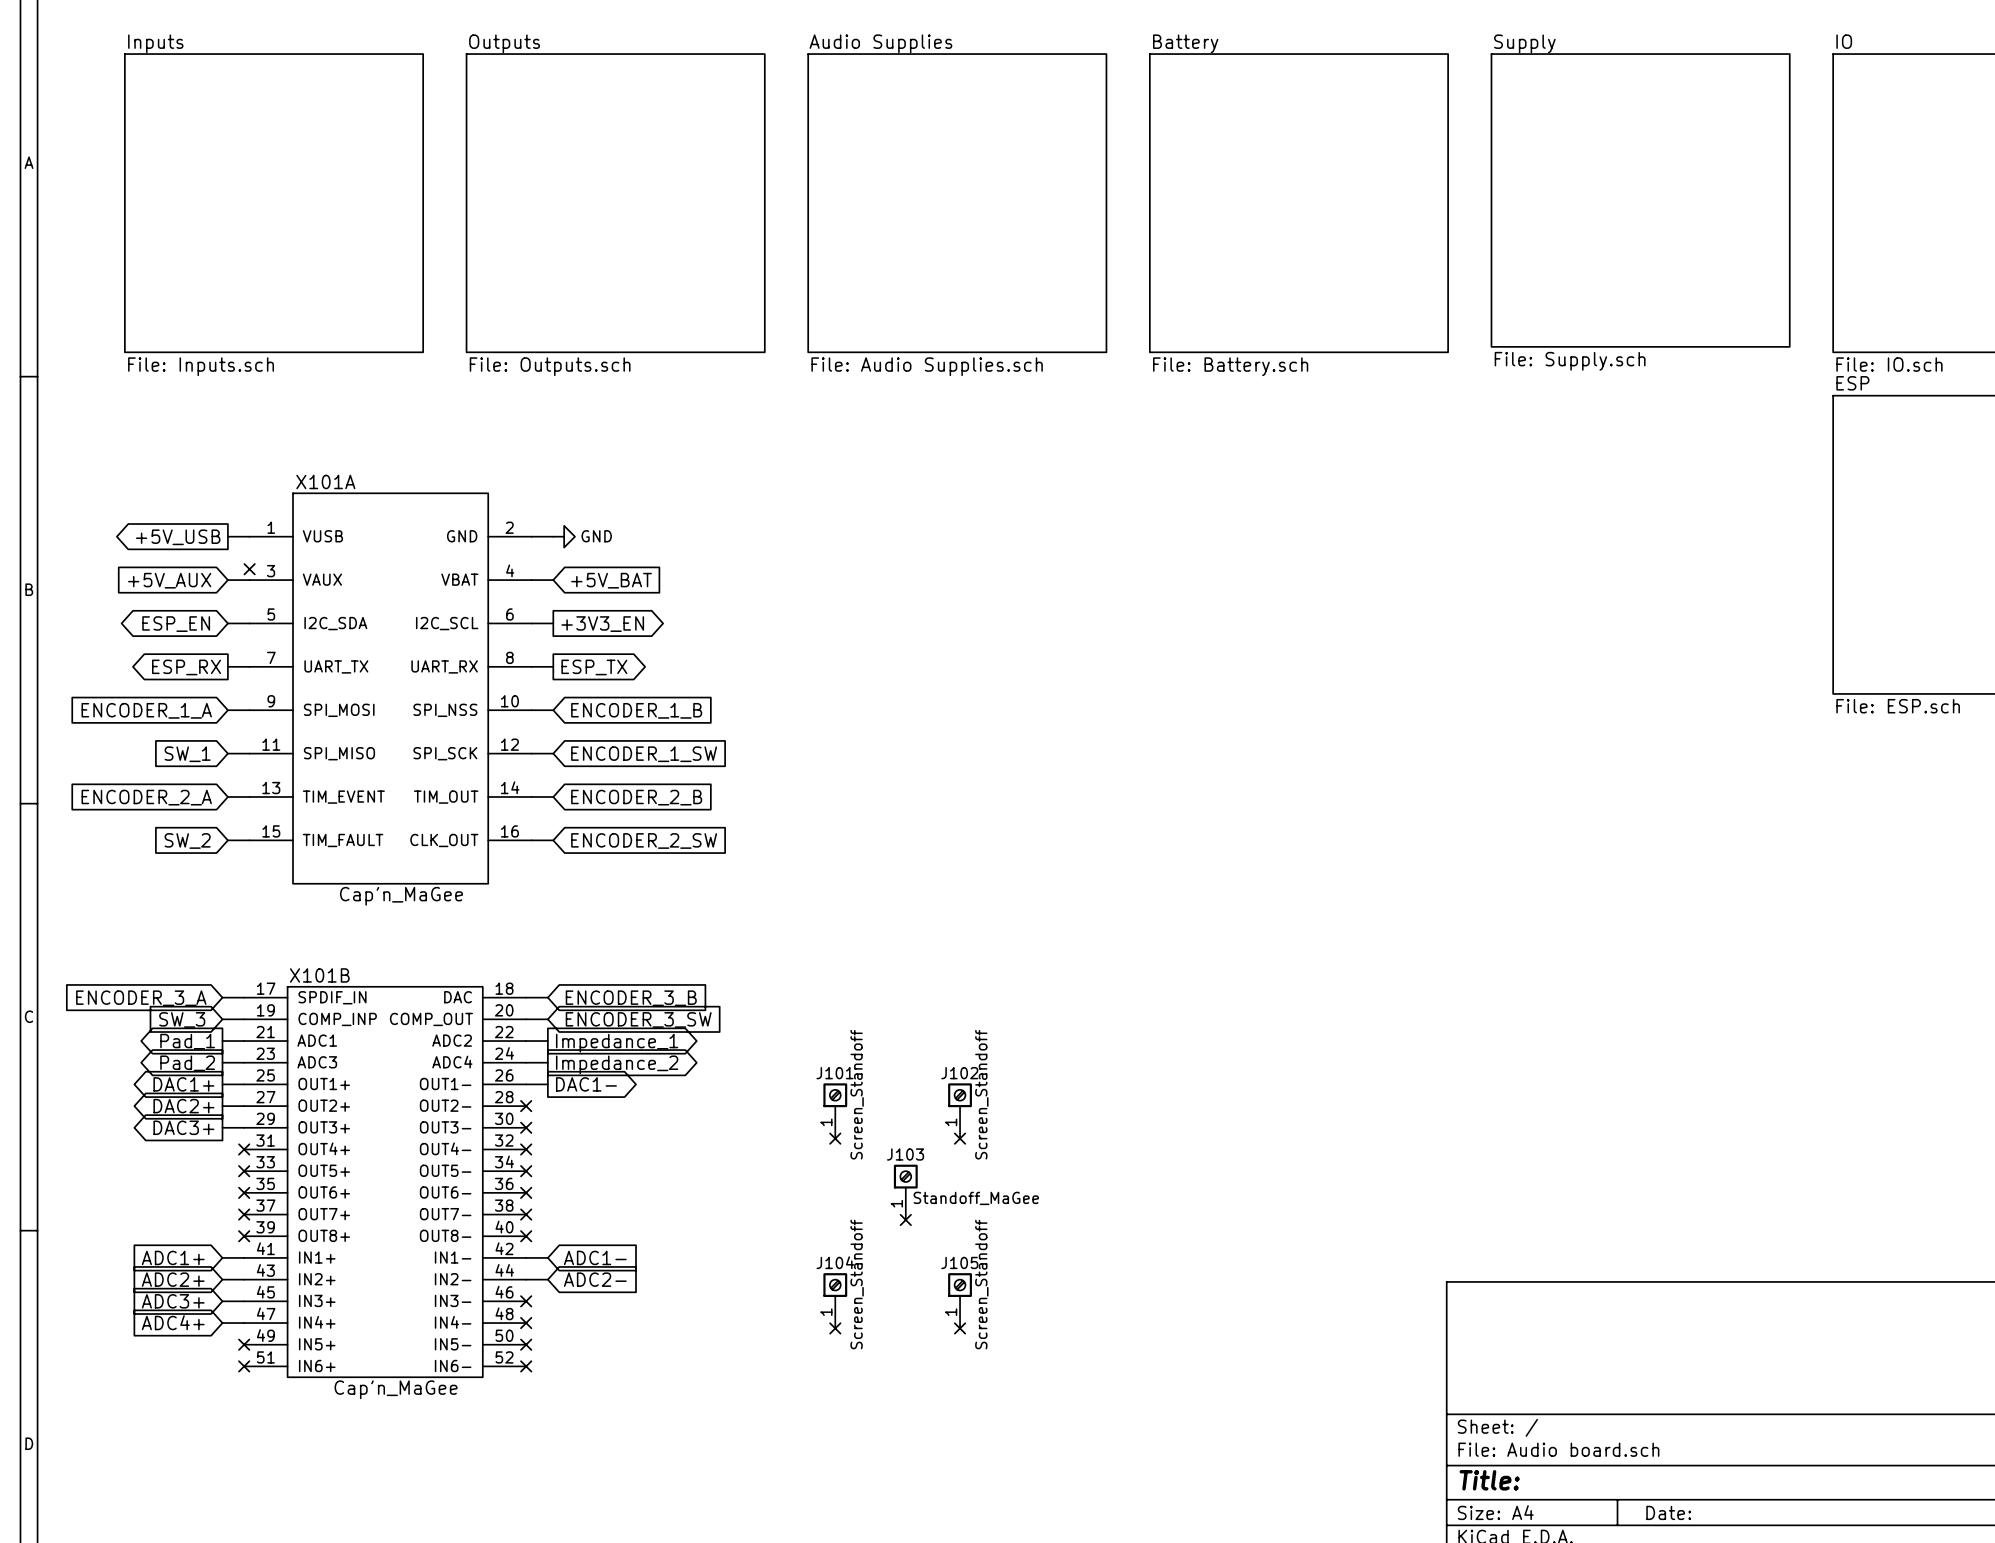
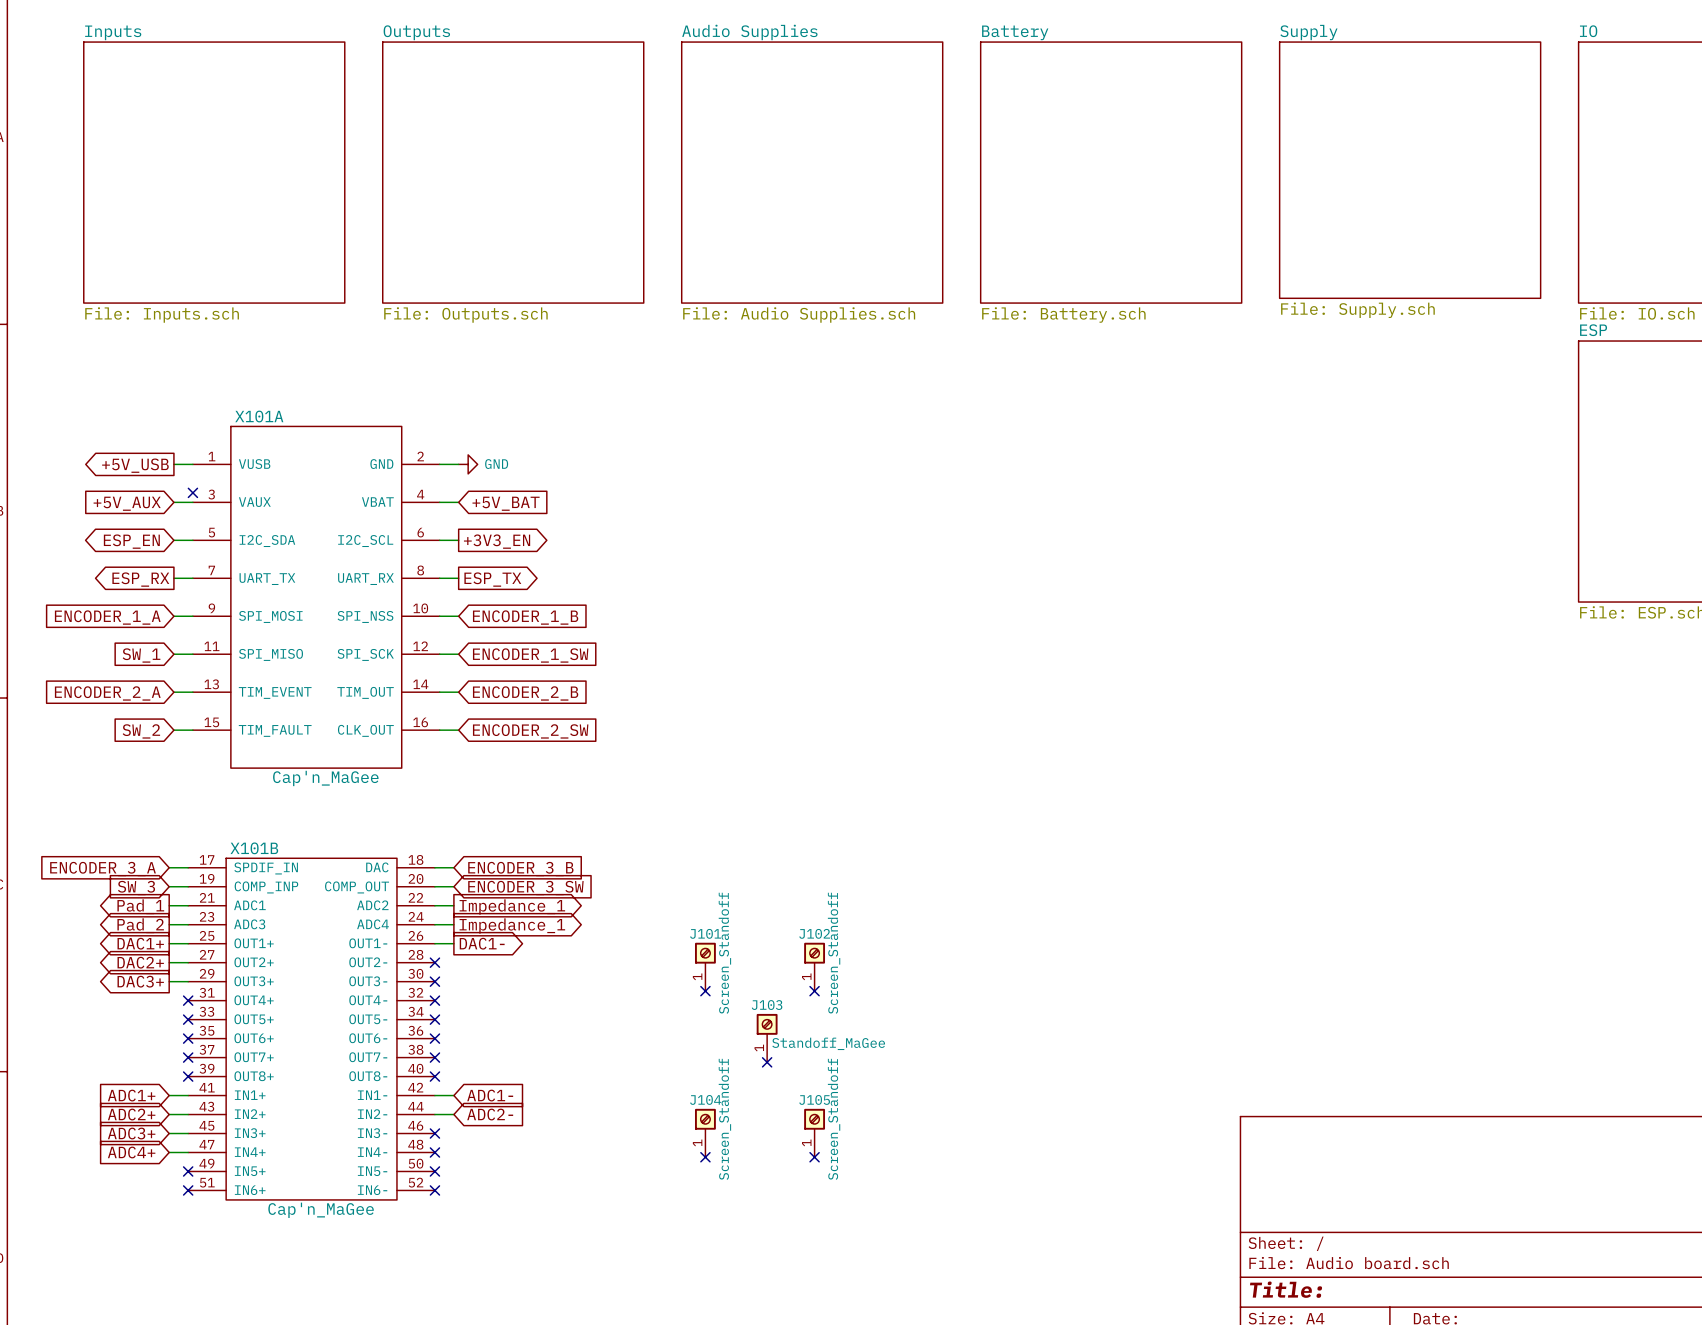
global label: Impedance_2 (617, 1064) -> Impedance_1 (512, 926)

